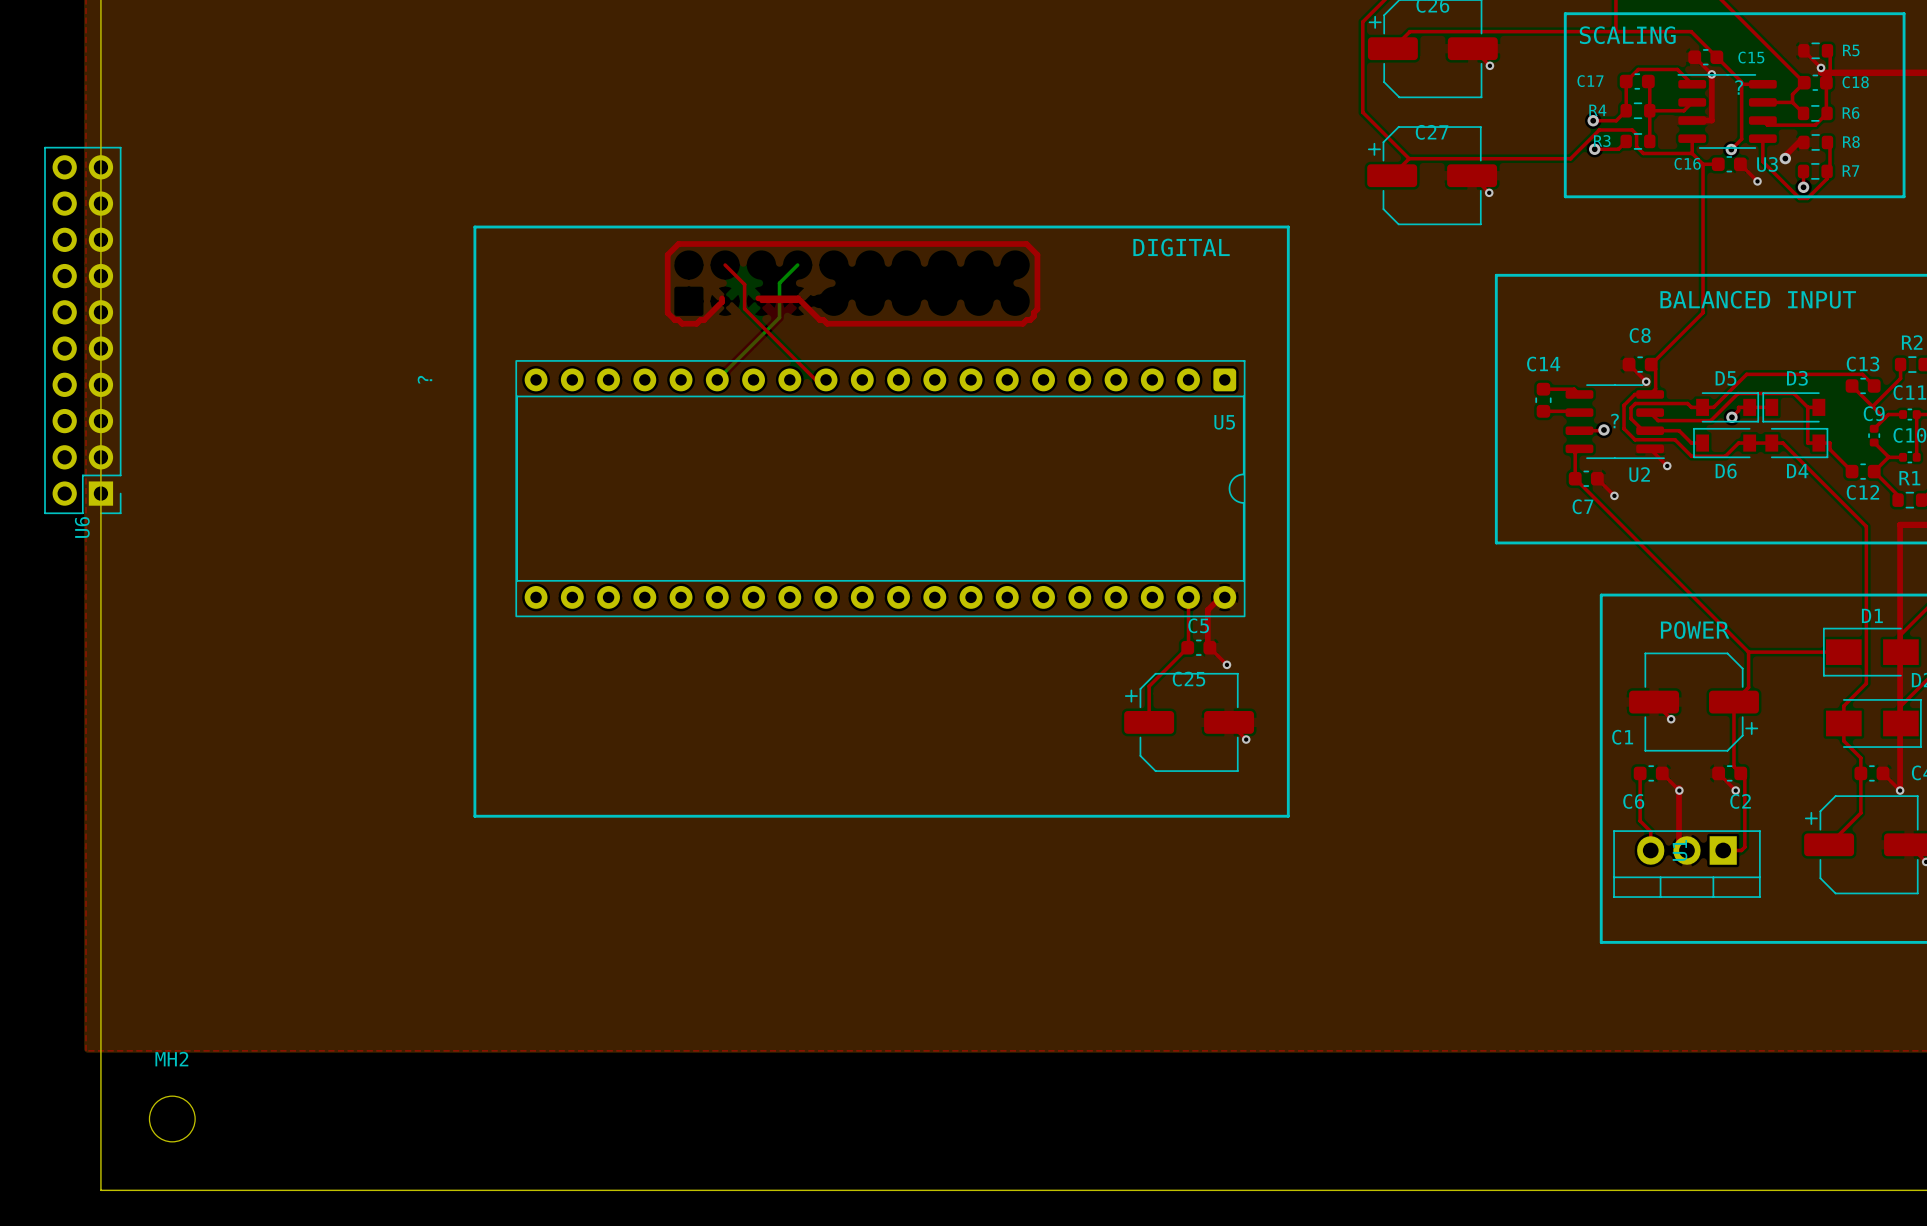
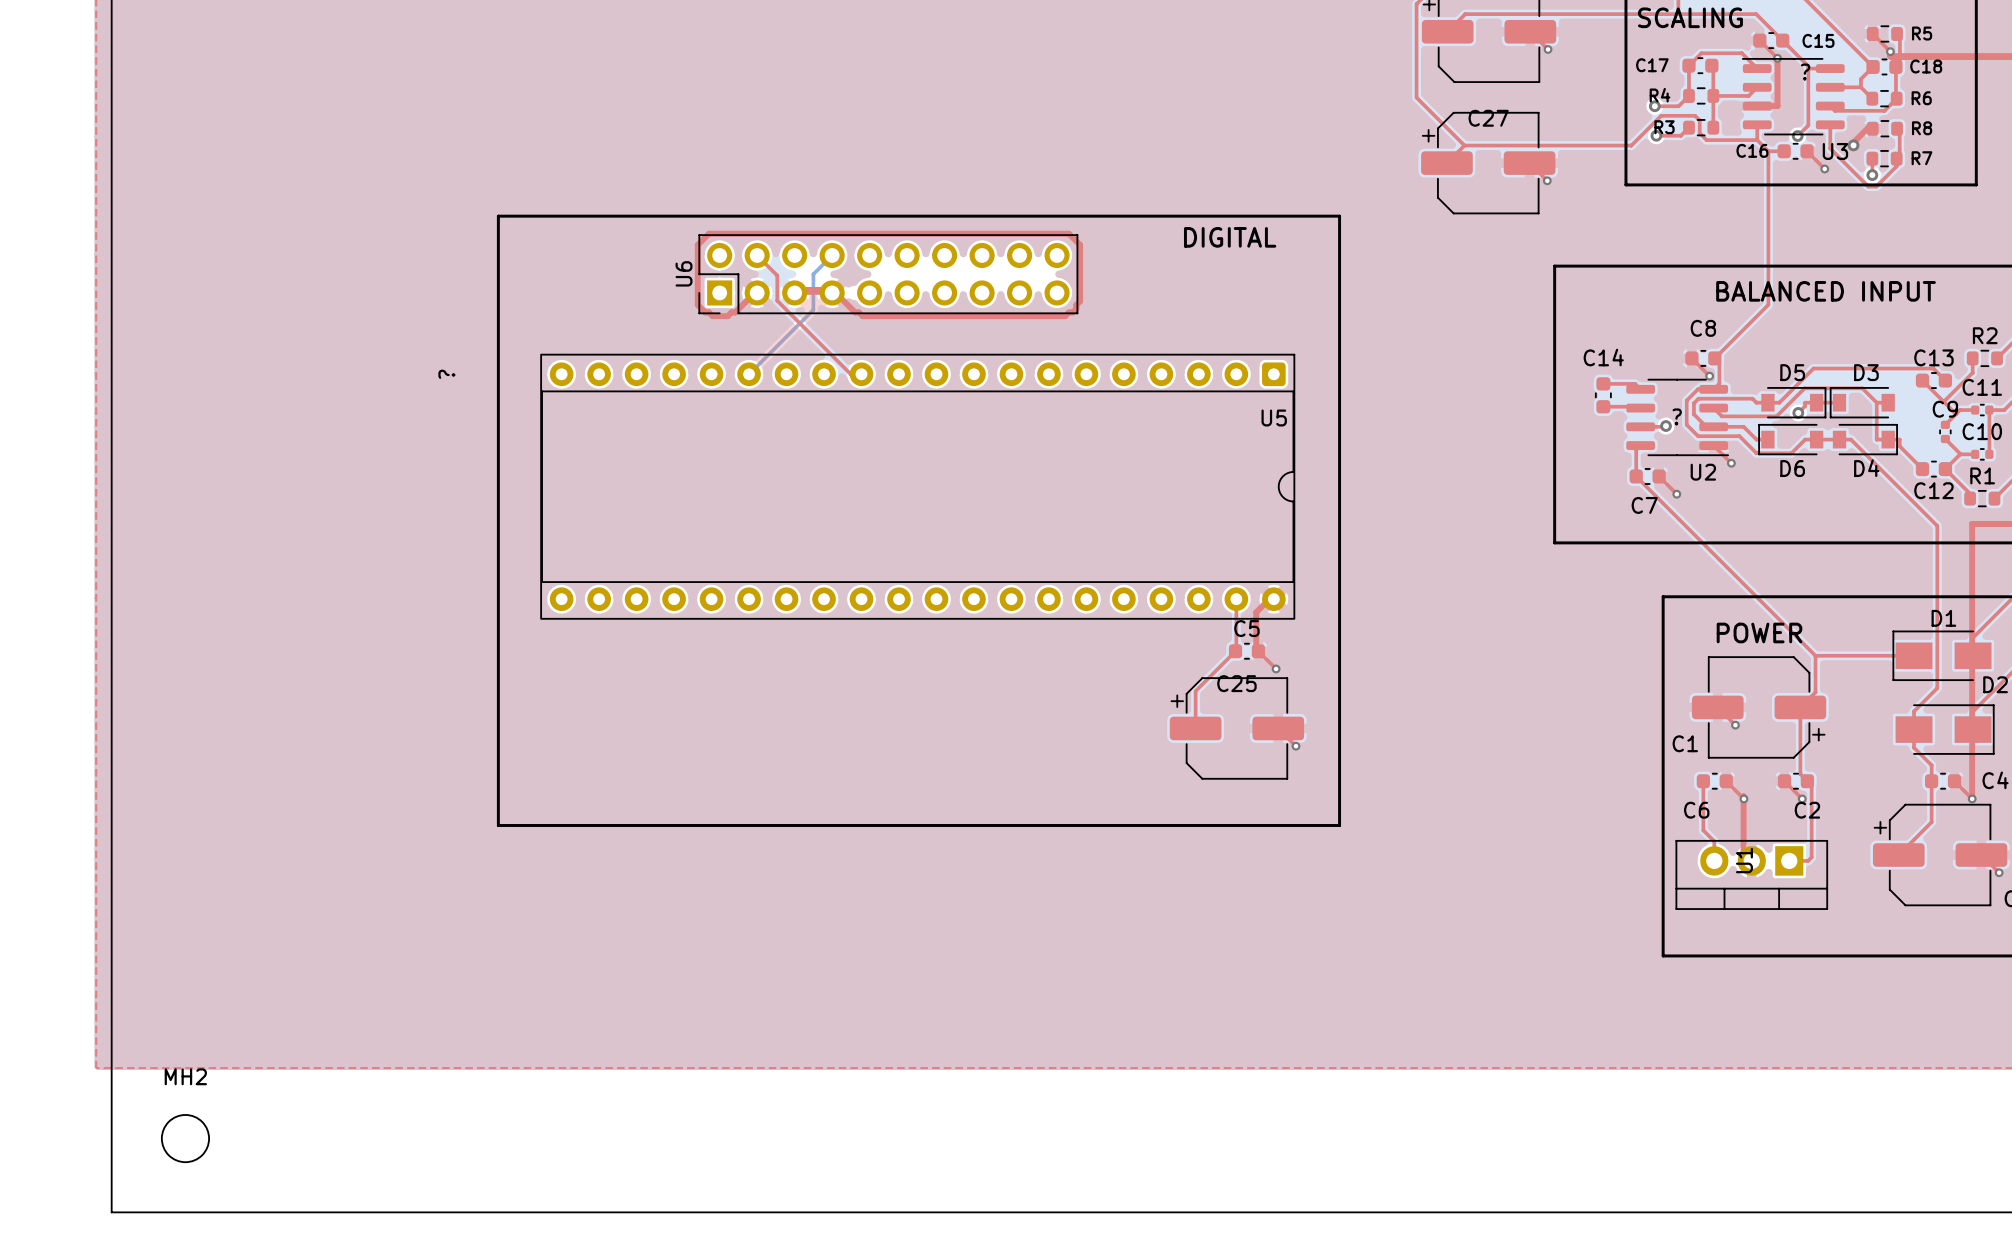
U6 rotation: 0° (82, 330) -> 90° clockwise (888, 274)
U6 position: (82, 330) -> (888, 274)

